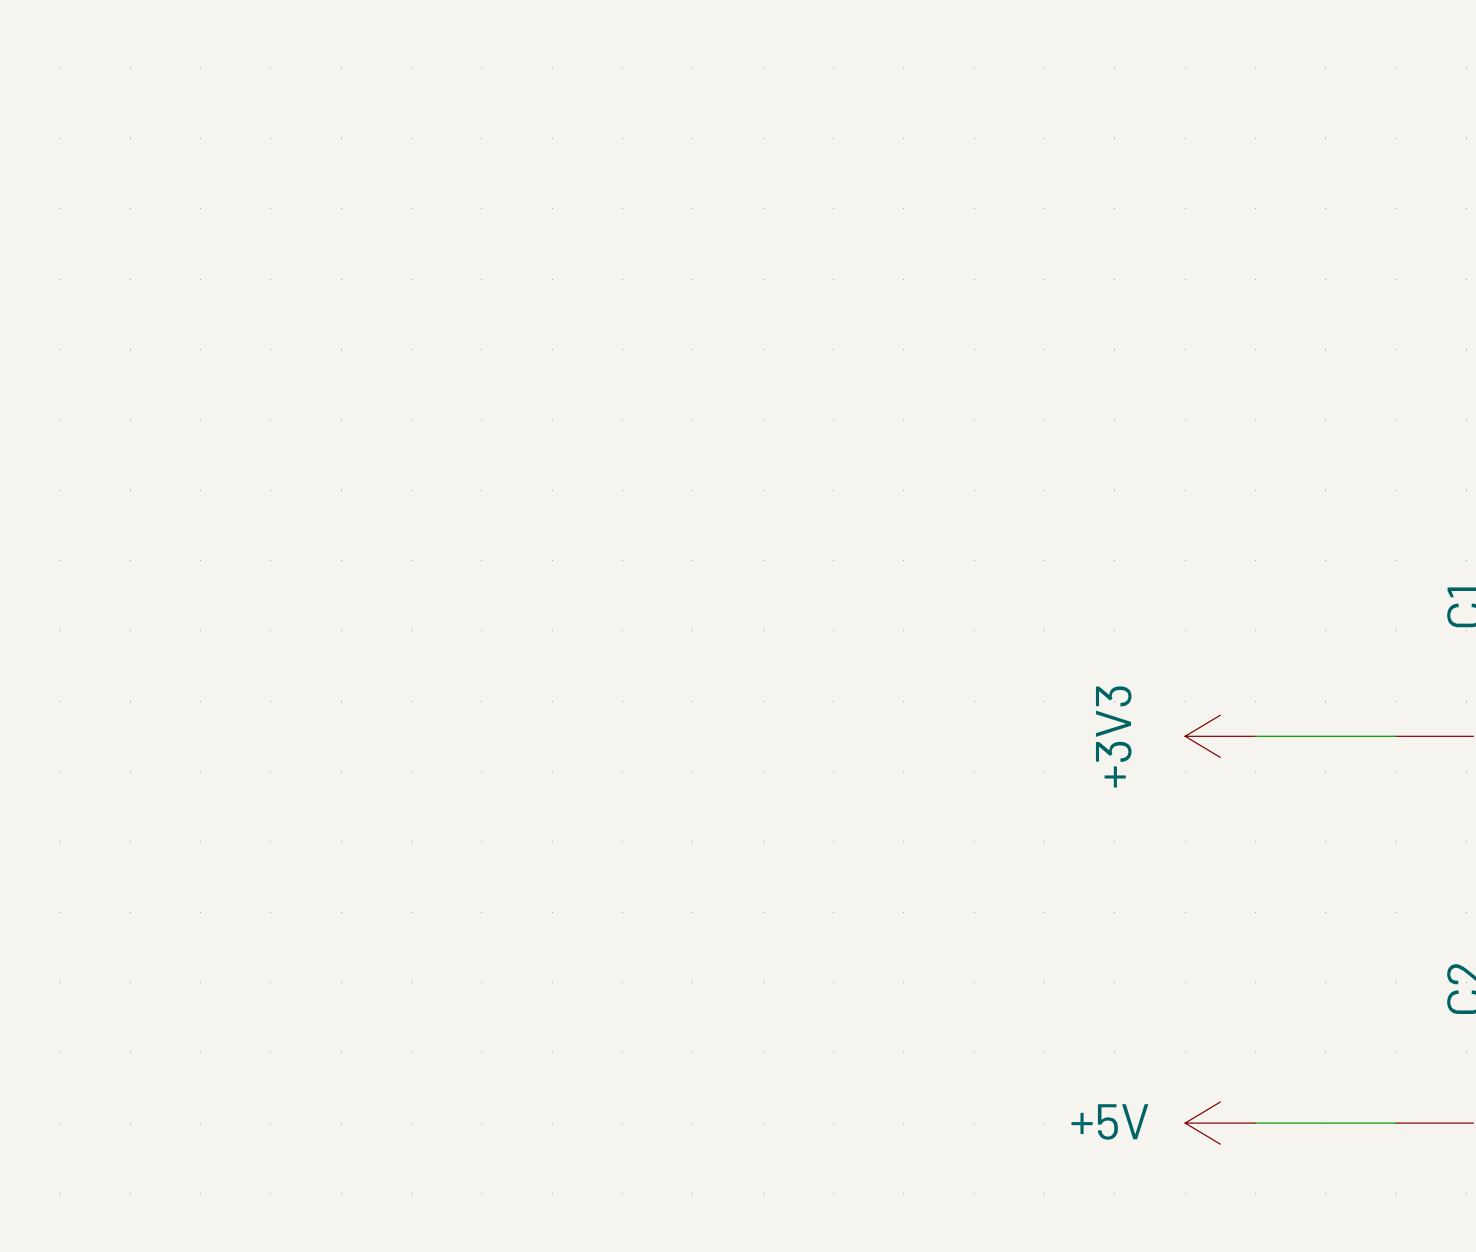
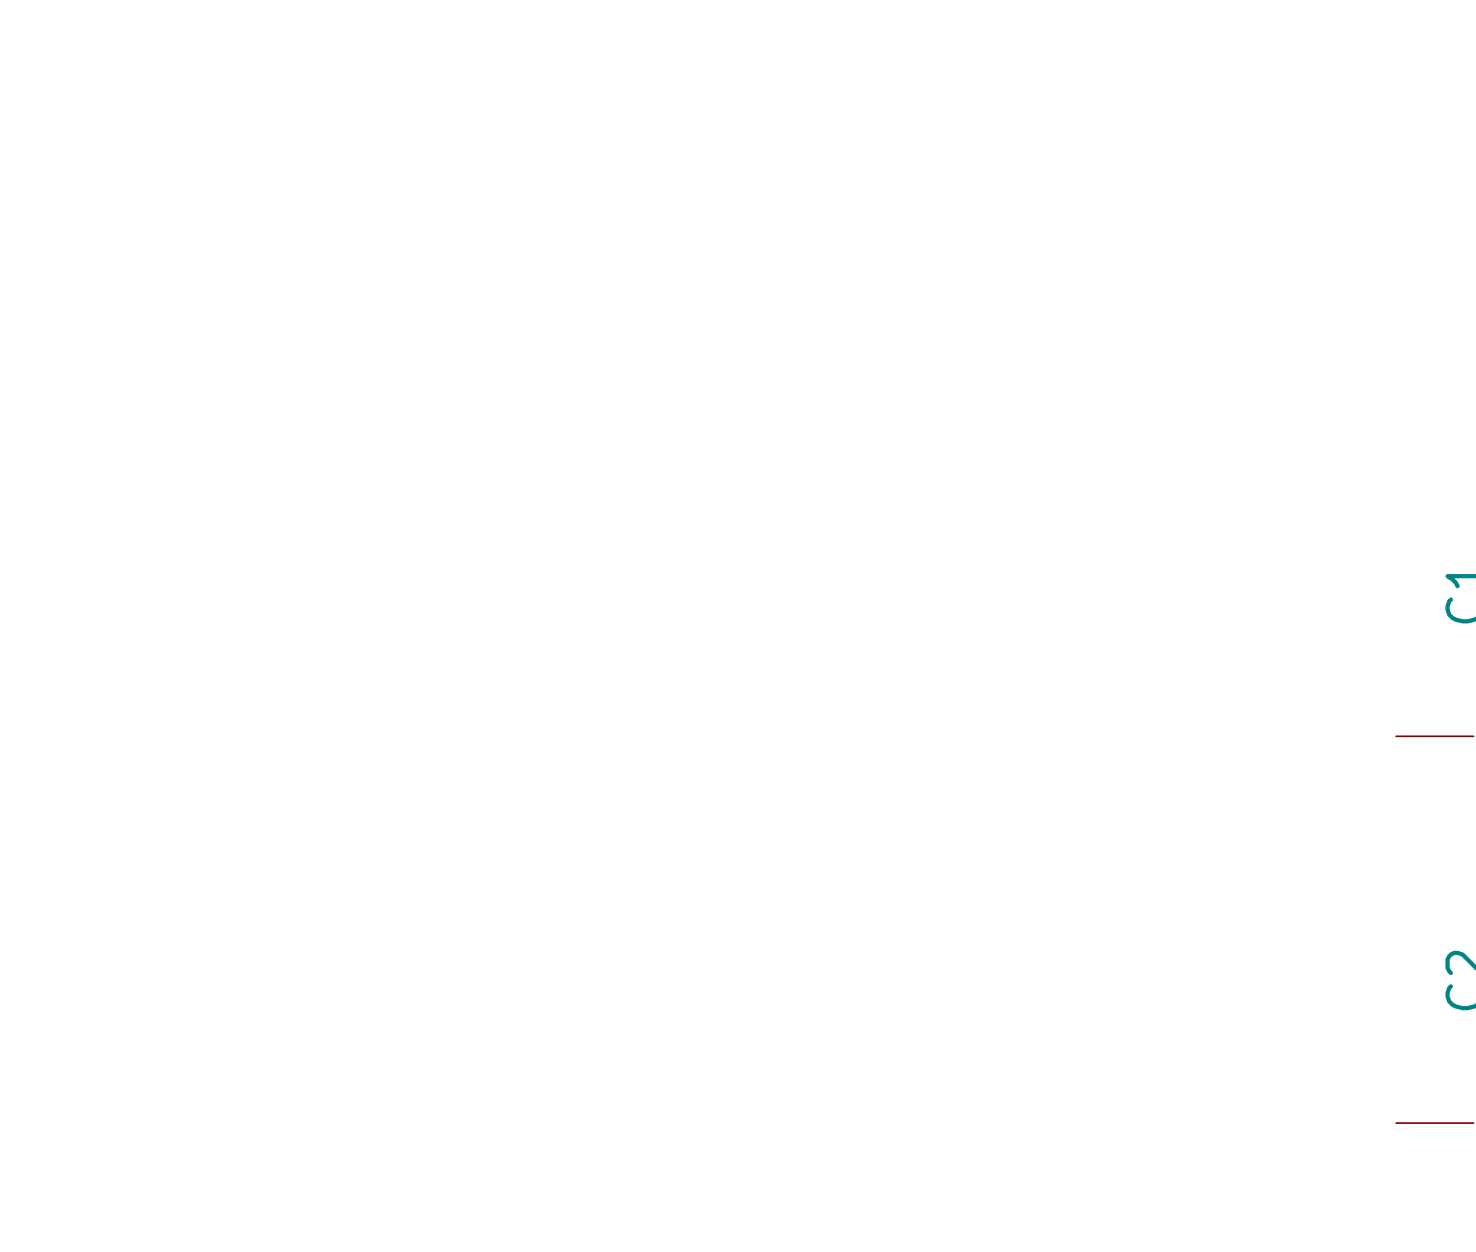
power symbol: +3V3 (1220, 736) -> none
wire: (1255, 736) (1396, 736) -> none
power symbol: +5V (1220, 1123) -> none
wire: (1255, 1123) (1396, 1123) -> none

